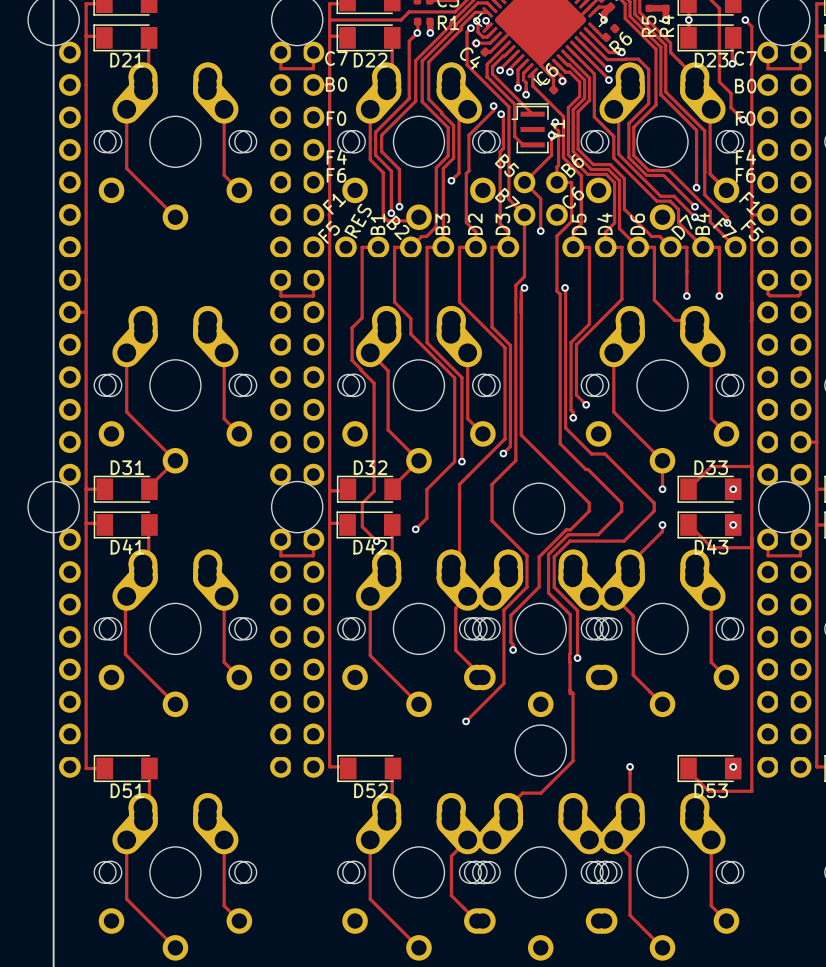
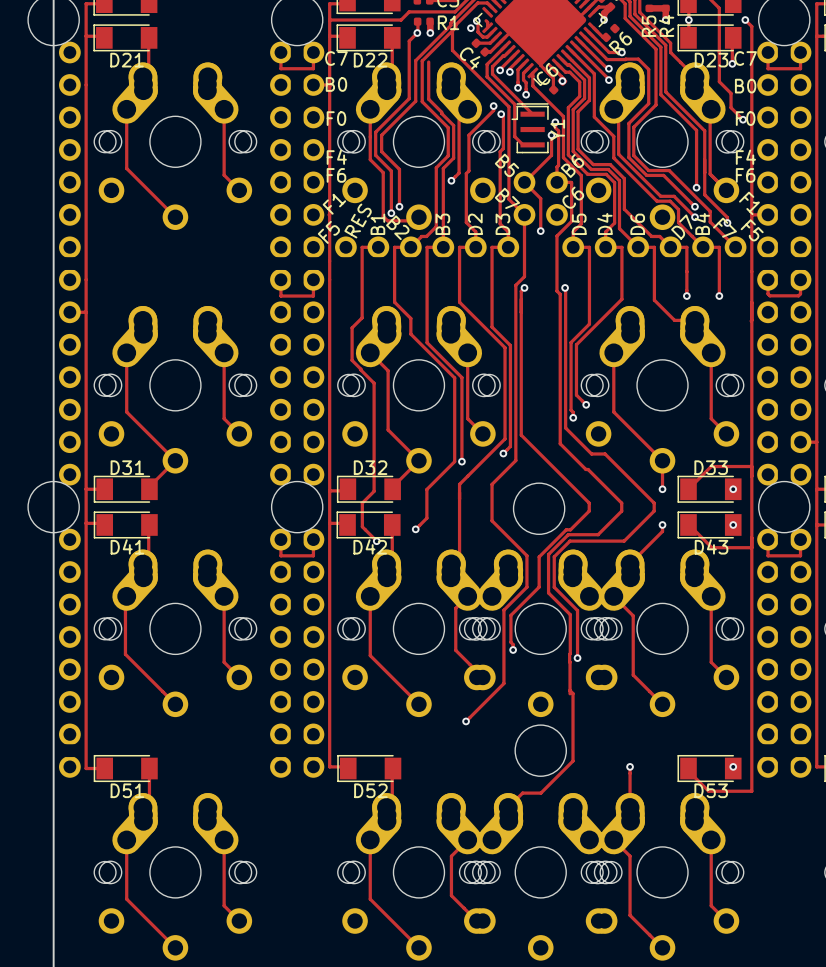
track: (487, 12) (475, 12) (428, 62) -> none
via: (486, 20) -> none
track: (470, 28) (467, 31) (467, 64) -> (452, 30) (452, 50) (467, 64)
via: (476, 43) -> none

